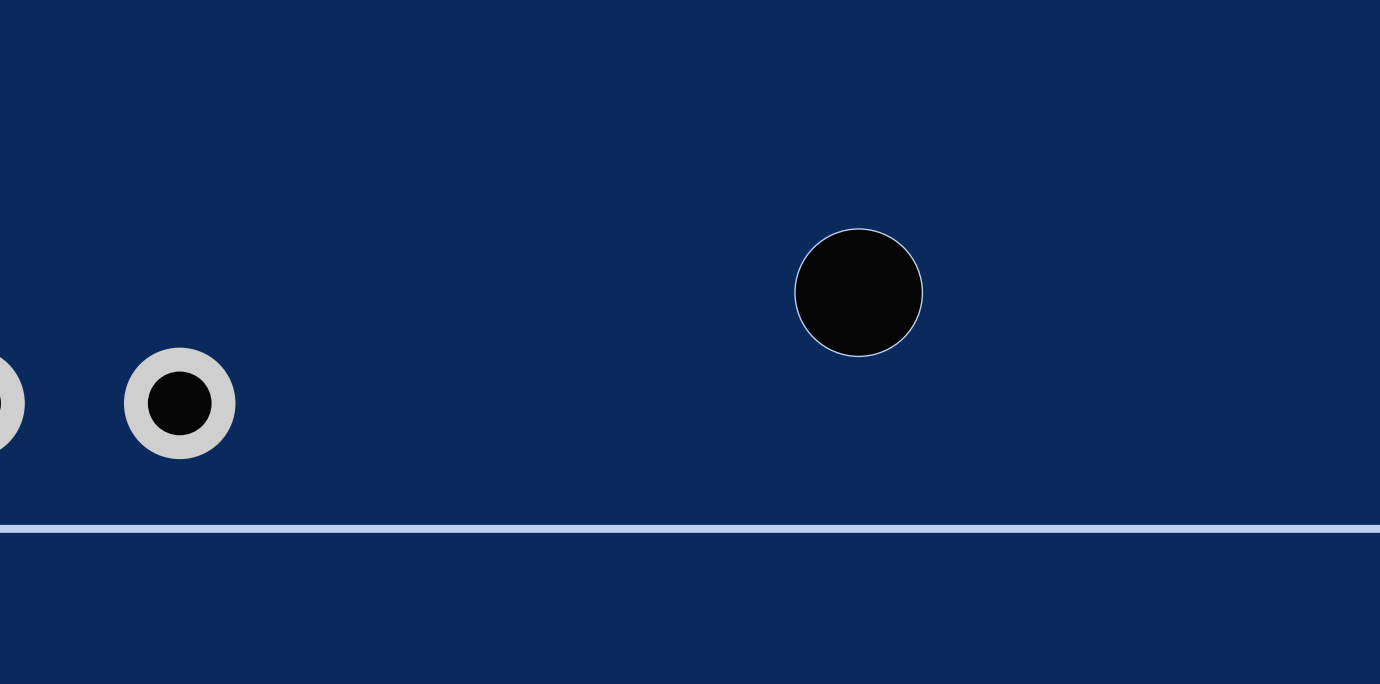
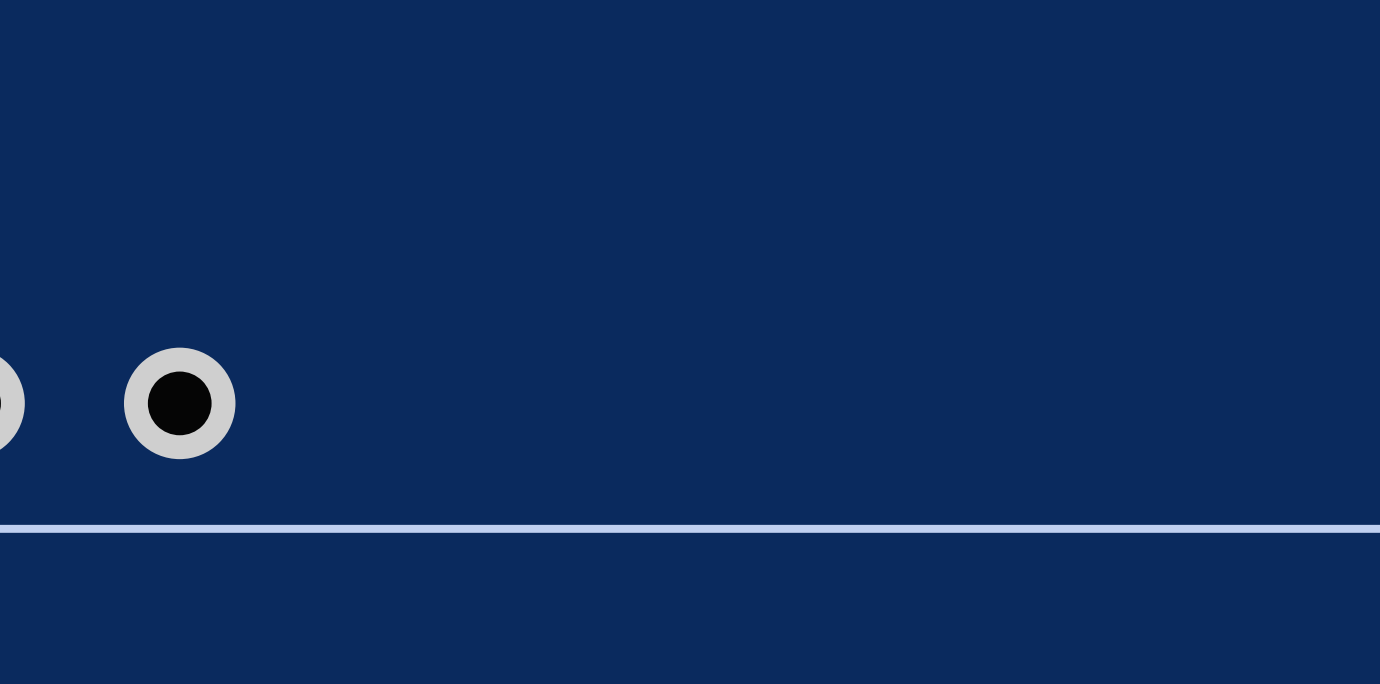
part: (858, 292) -> none

